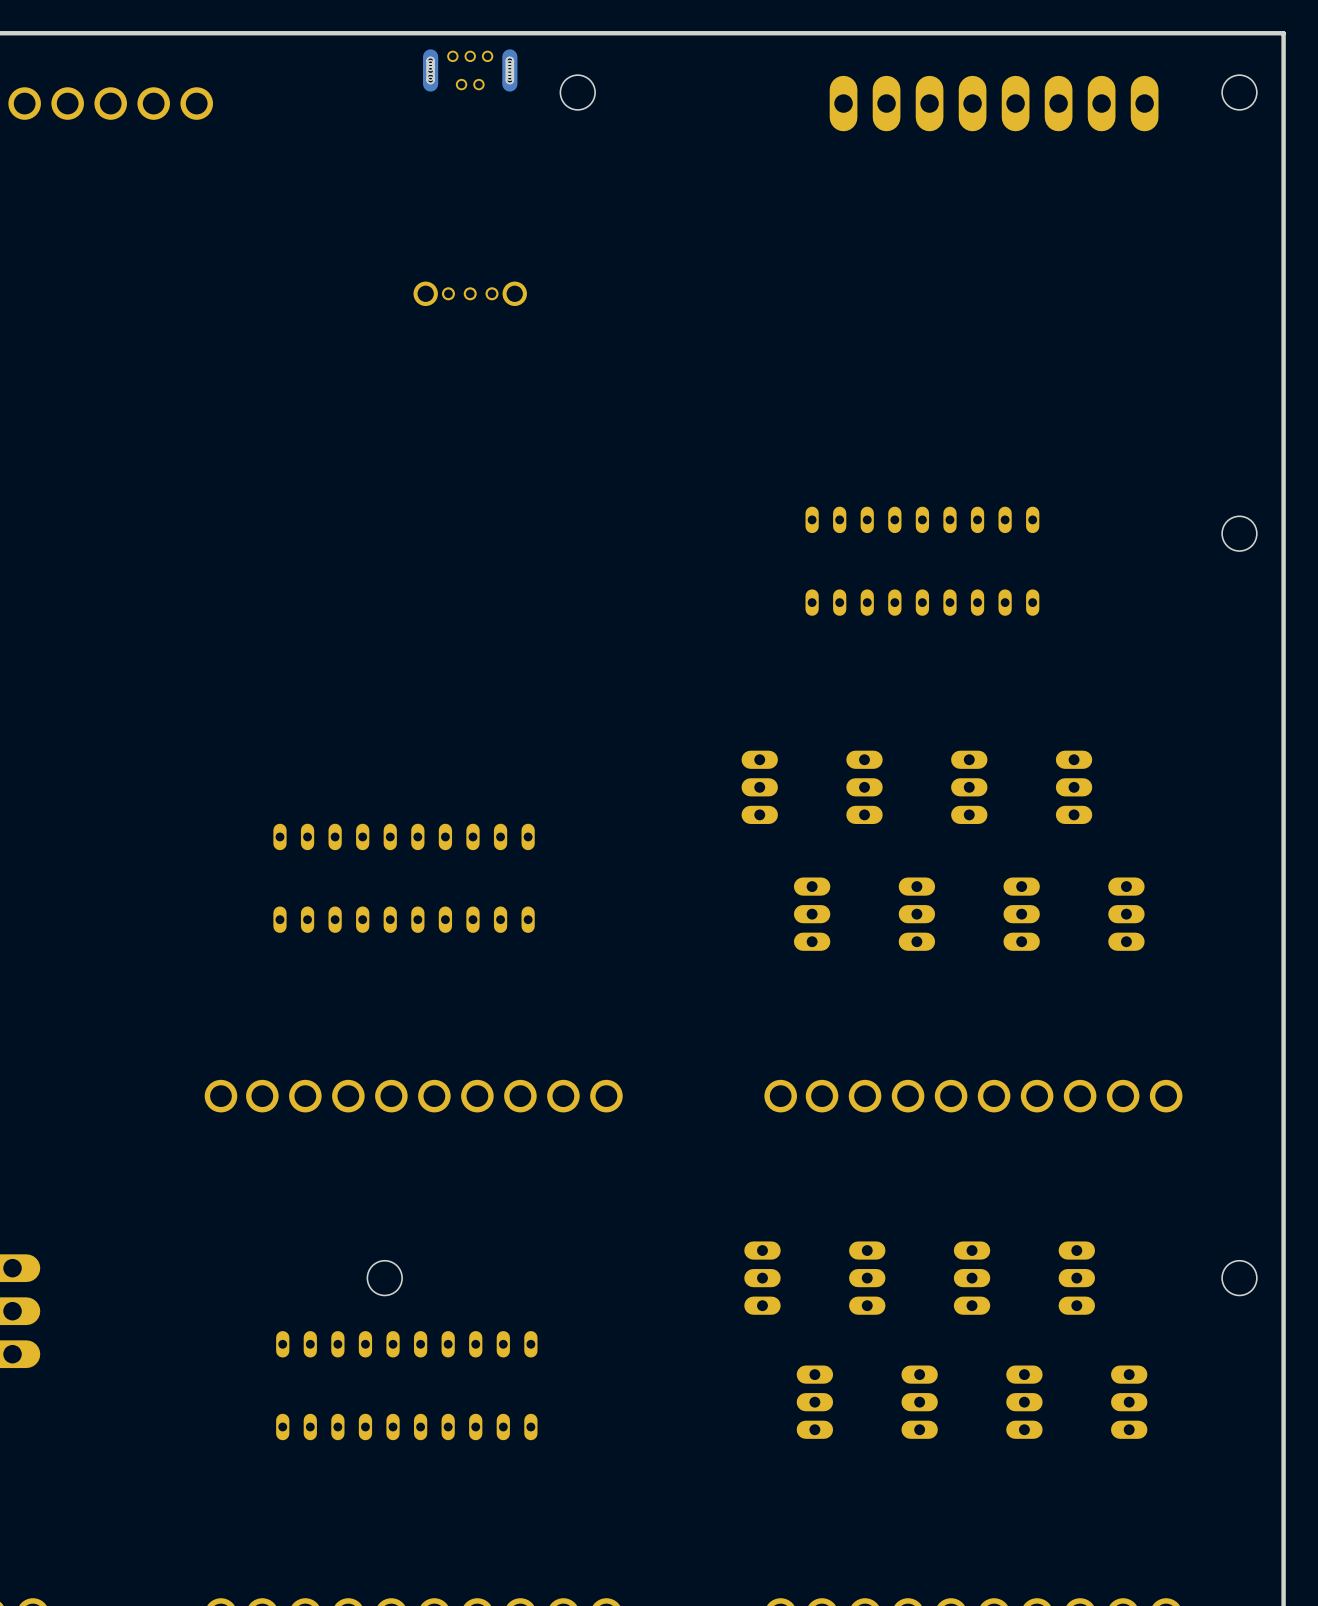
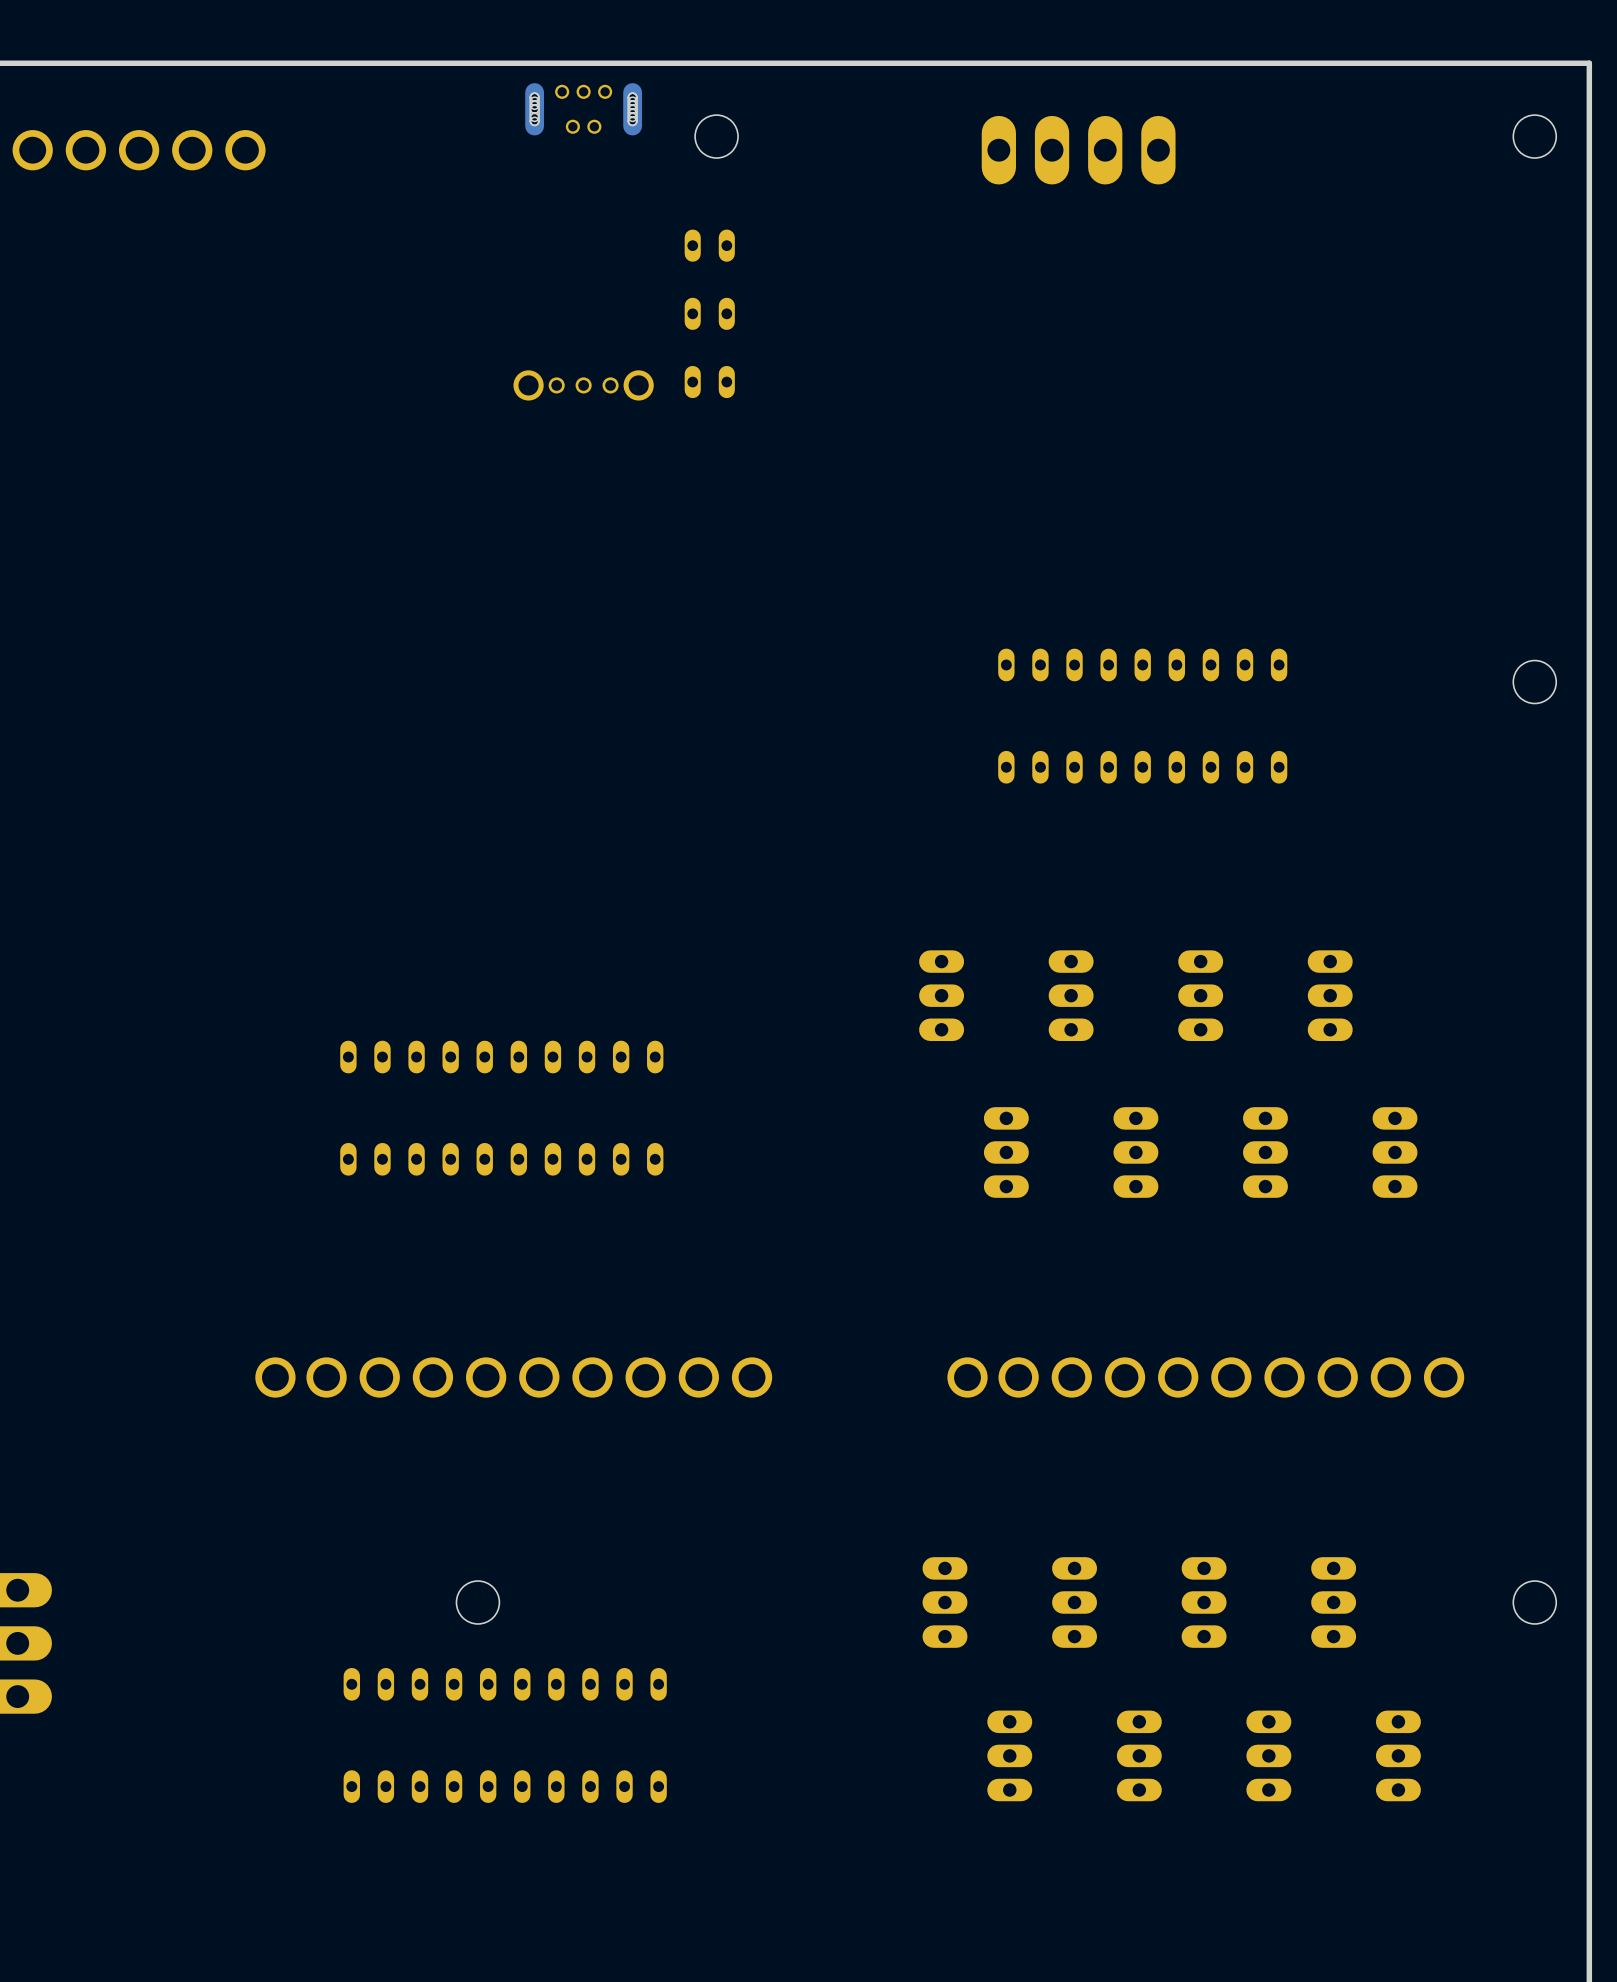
part: none -> (1078, 150)
part: (994, 103) -> none
part: none -> (709, 245)
part: none -> (709, 313)
part: none -> (709, 382)

